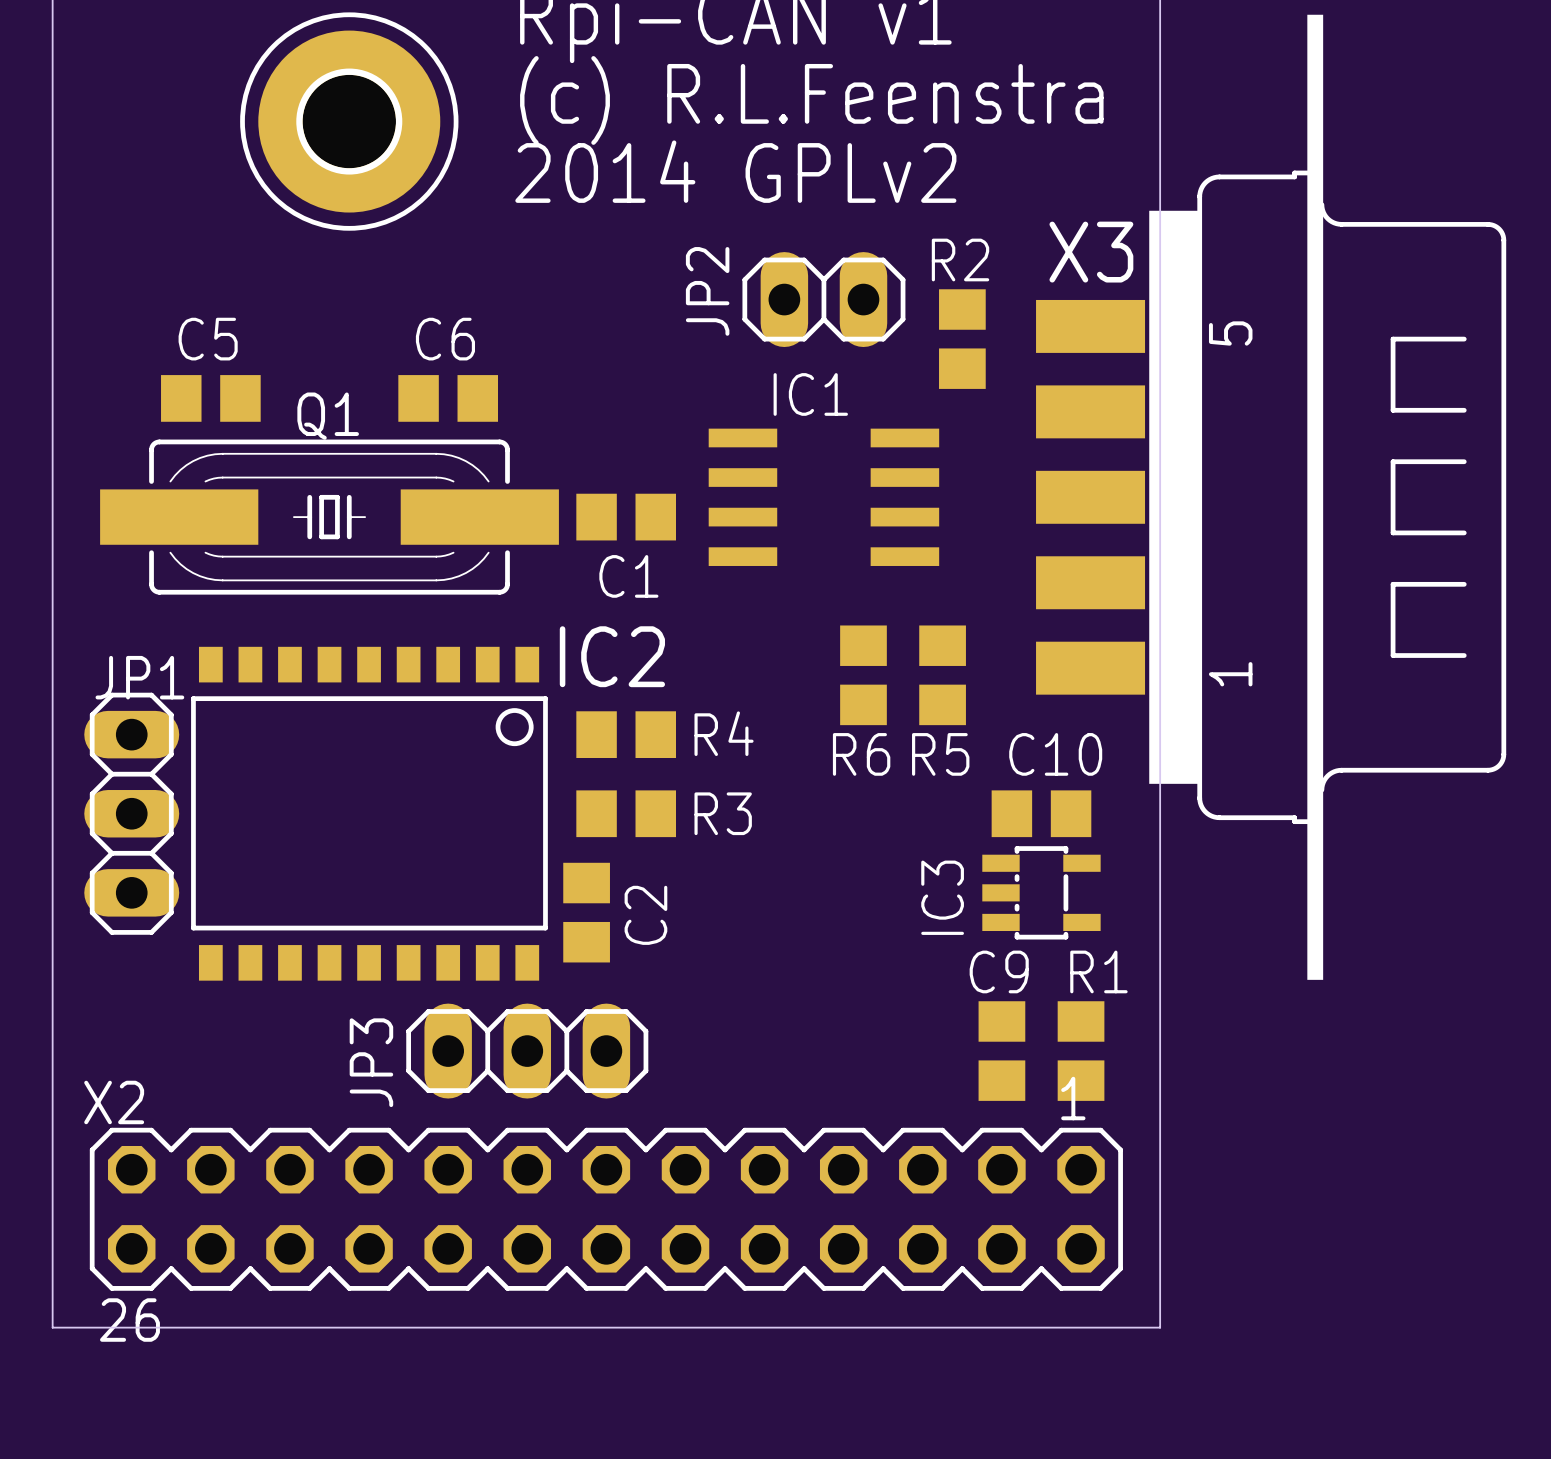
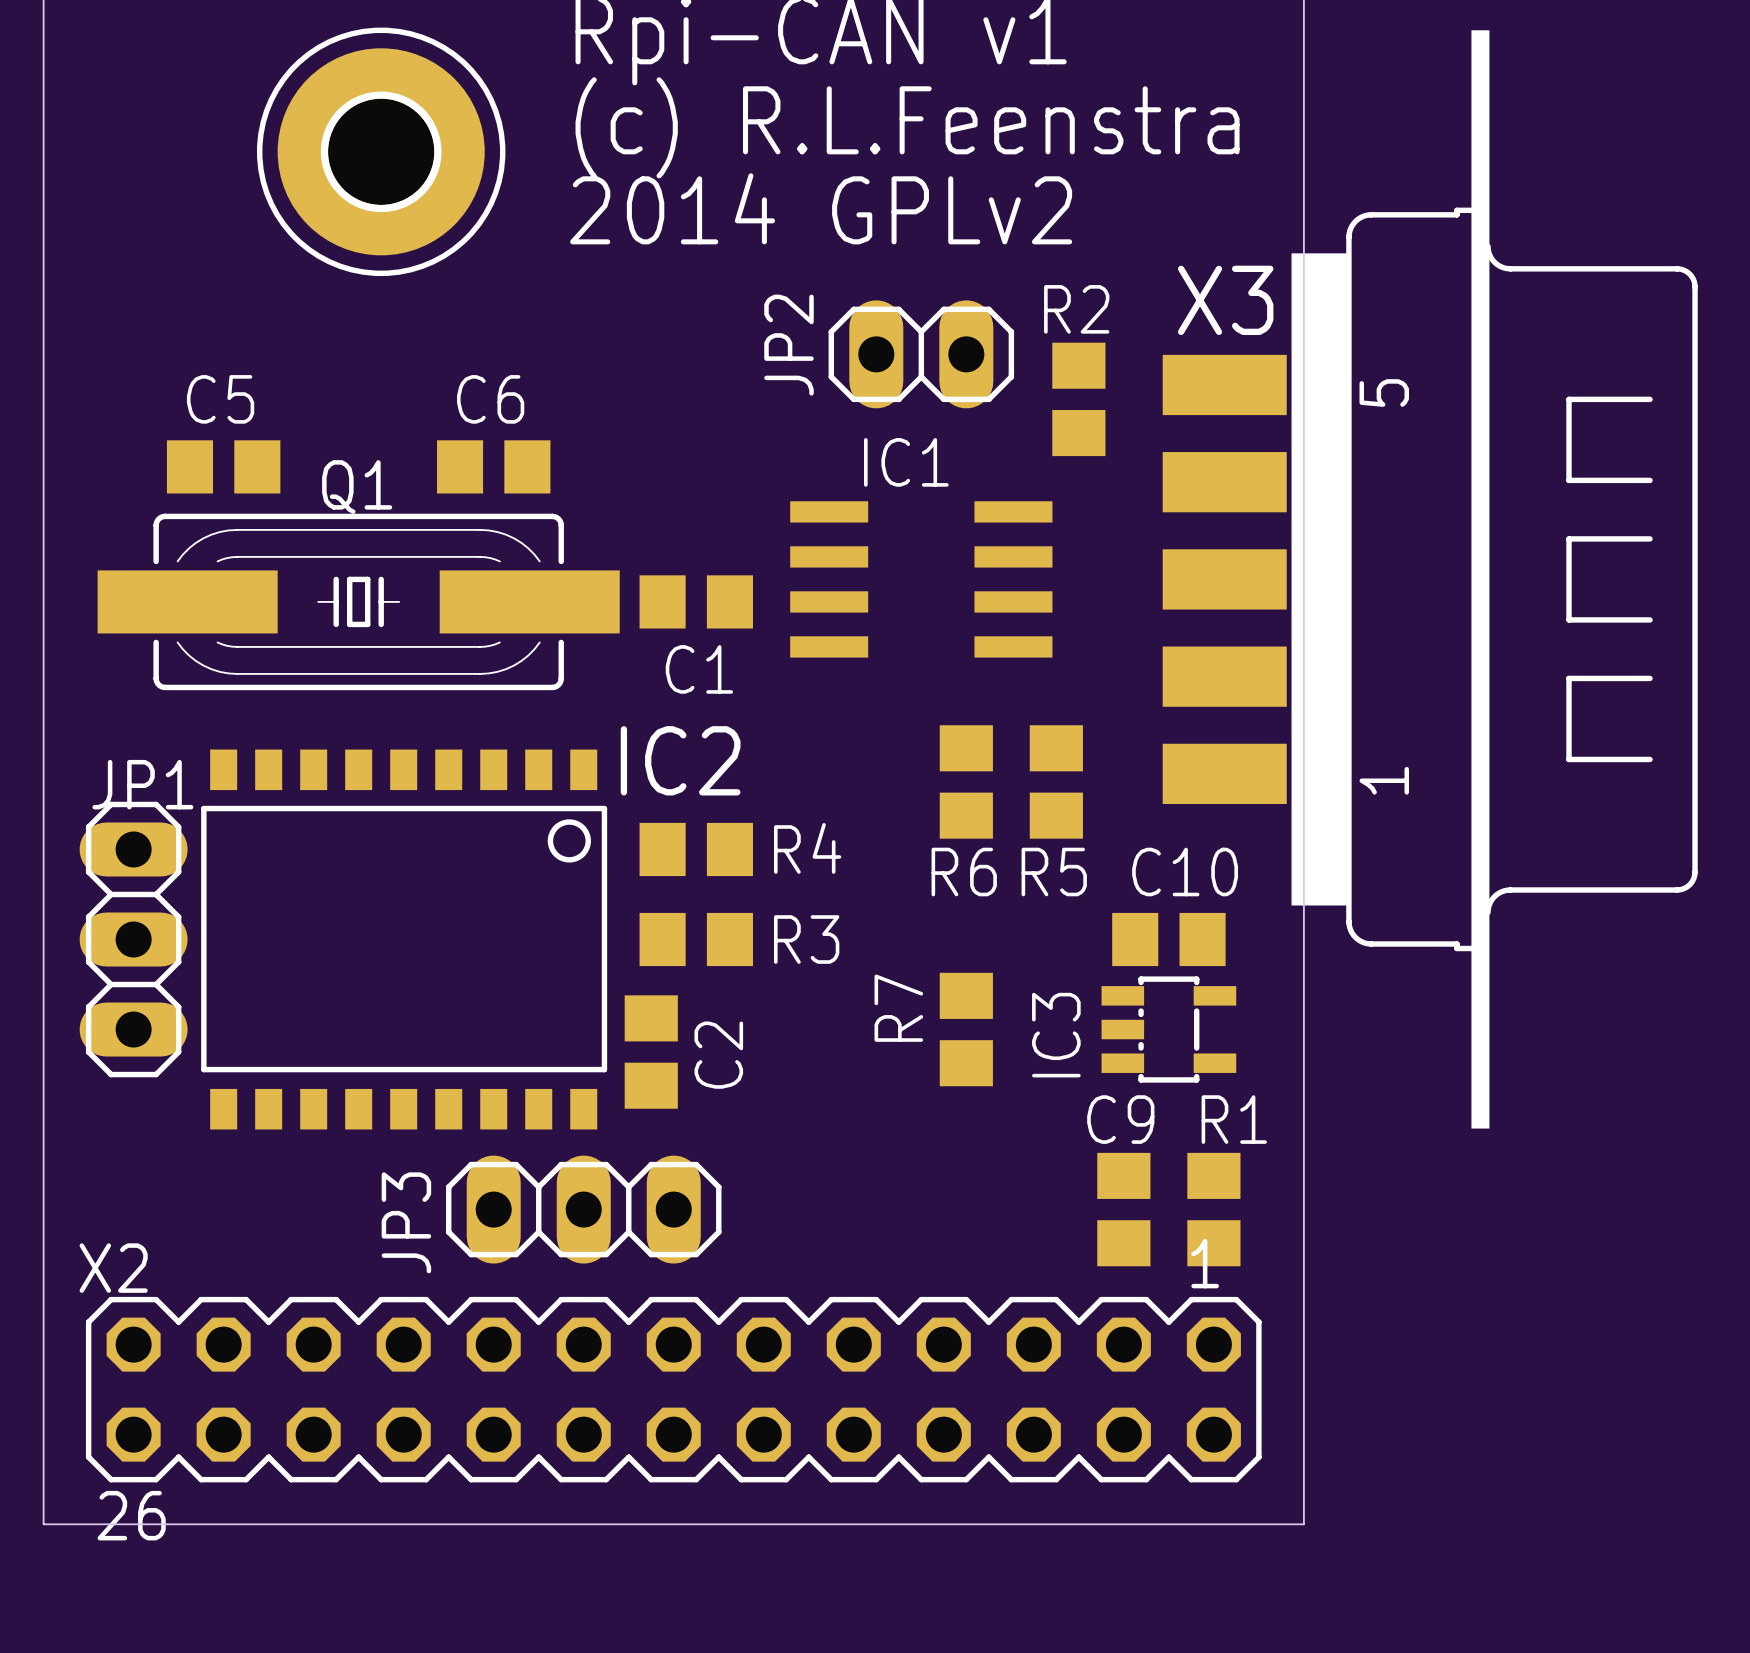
R7: none -> (966, 1029)

